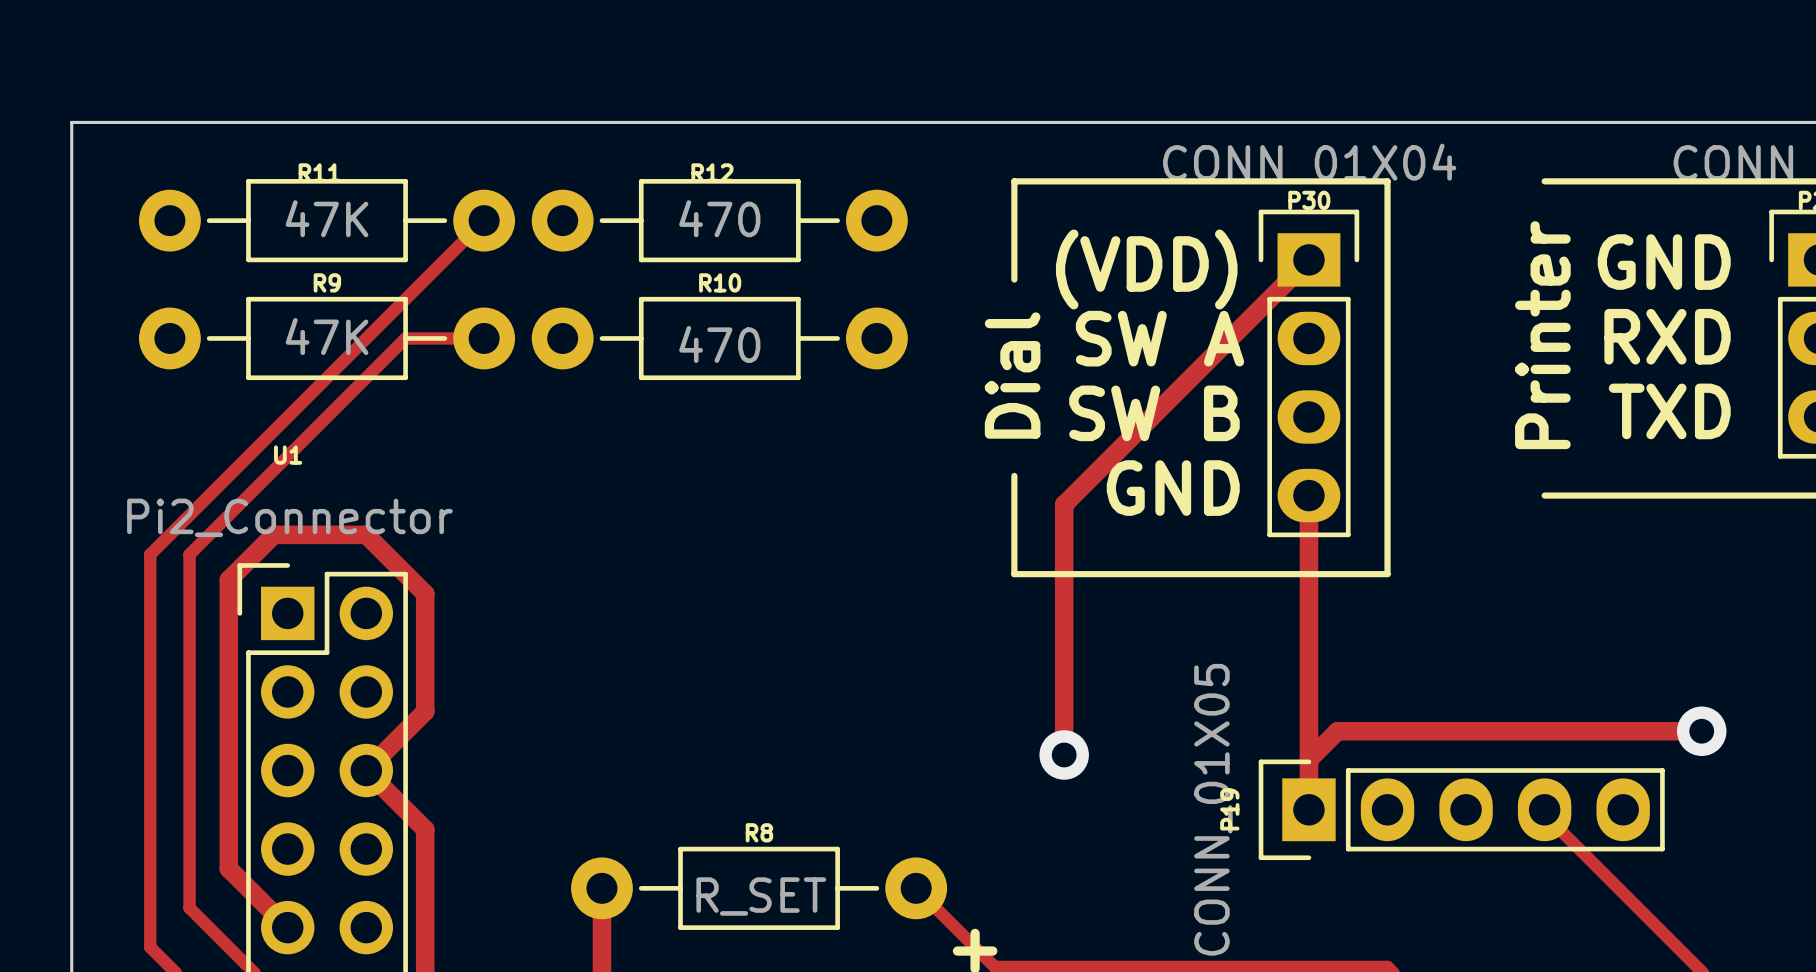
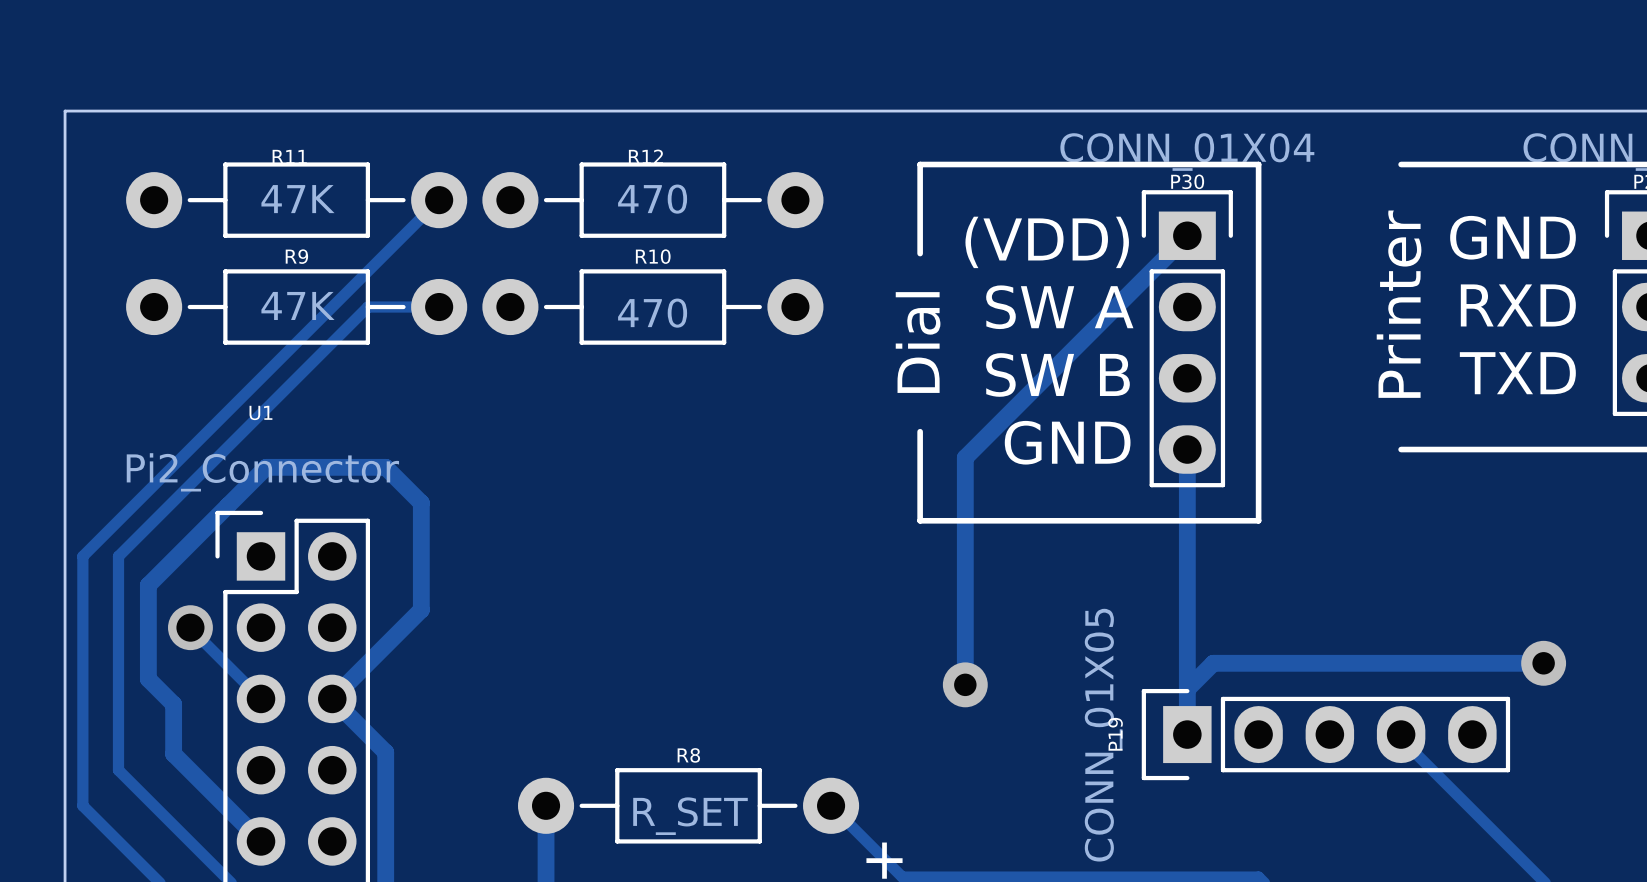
track: (273, 534) (366, 534) (425, 593) (425, 711) -> (248, 485) (266, 467) (385, 467) (421, 502) (421, 609) (385, 645)
track: (150, 554) (150, 947) -> (136, 502) (82, 556) (82, 805) (136, 859)
track: (189, 554) (189, 907) -> (171, 502) (118, 556) (118, 770) (171, 823)
track: (251, 557) (228, 579) (228, 868) -> (228, 505) (148, 585) (148, 679) (173, 704) (173, 754) (207, 788)
track: none -> (190, 627) (261, 698)
via: none -> (190, 627)

